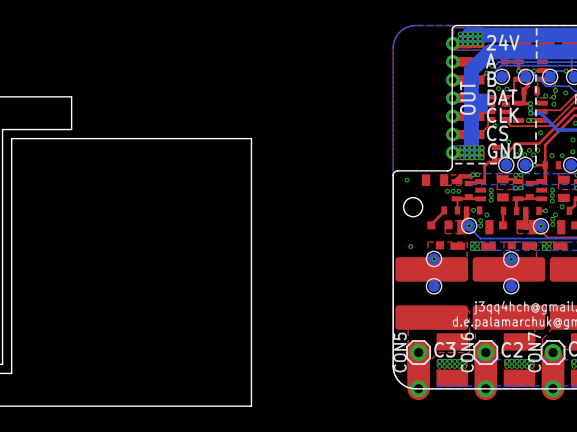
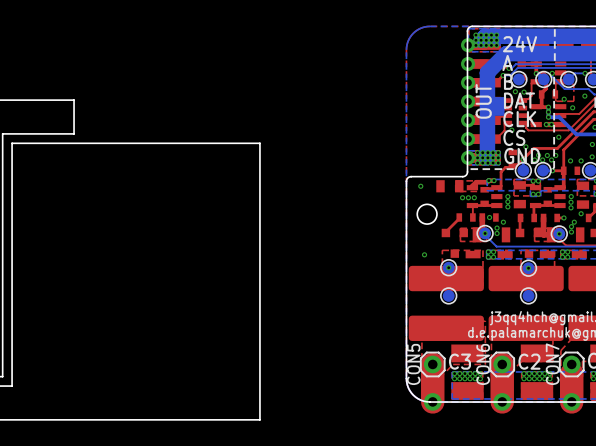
via: (555, 90) -> none
via: (553, 97) -> none

